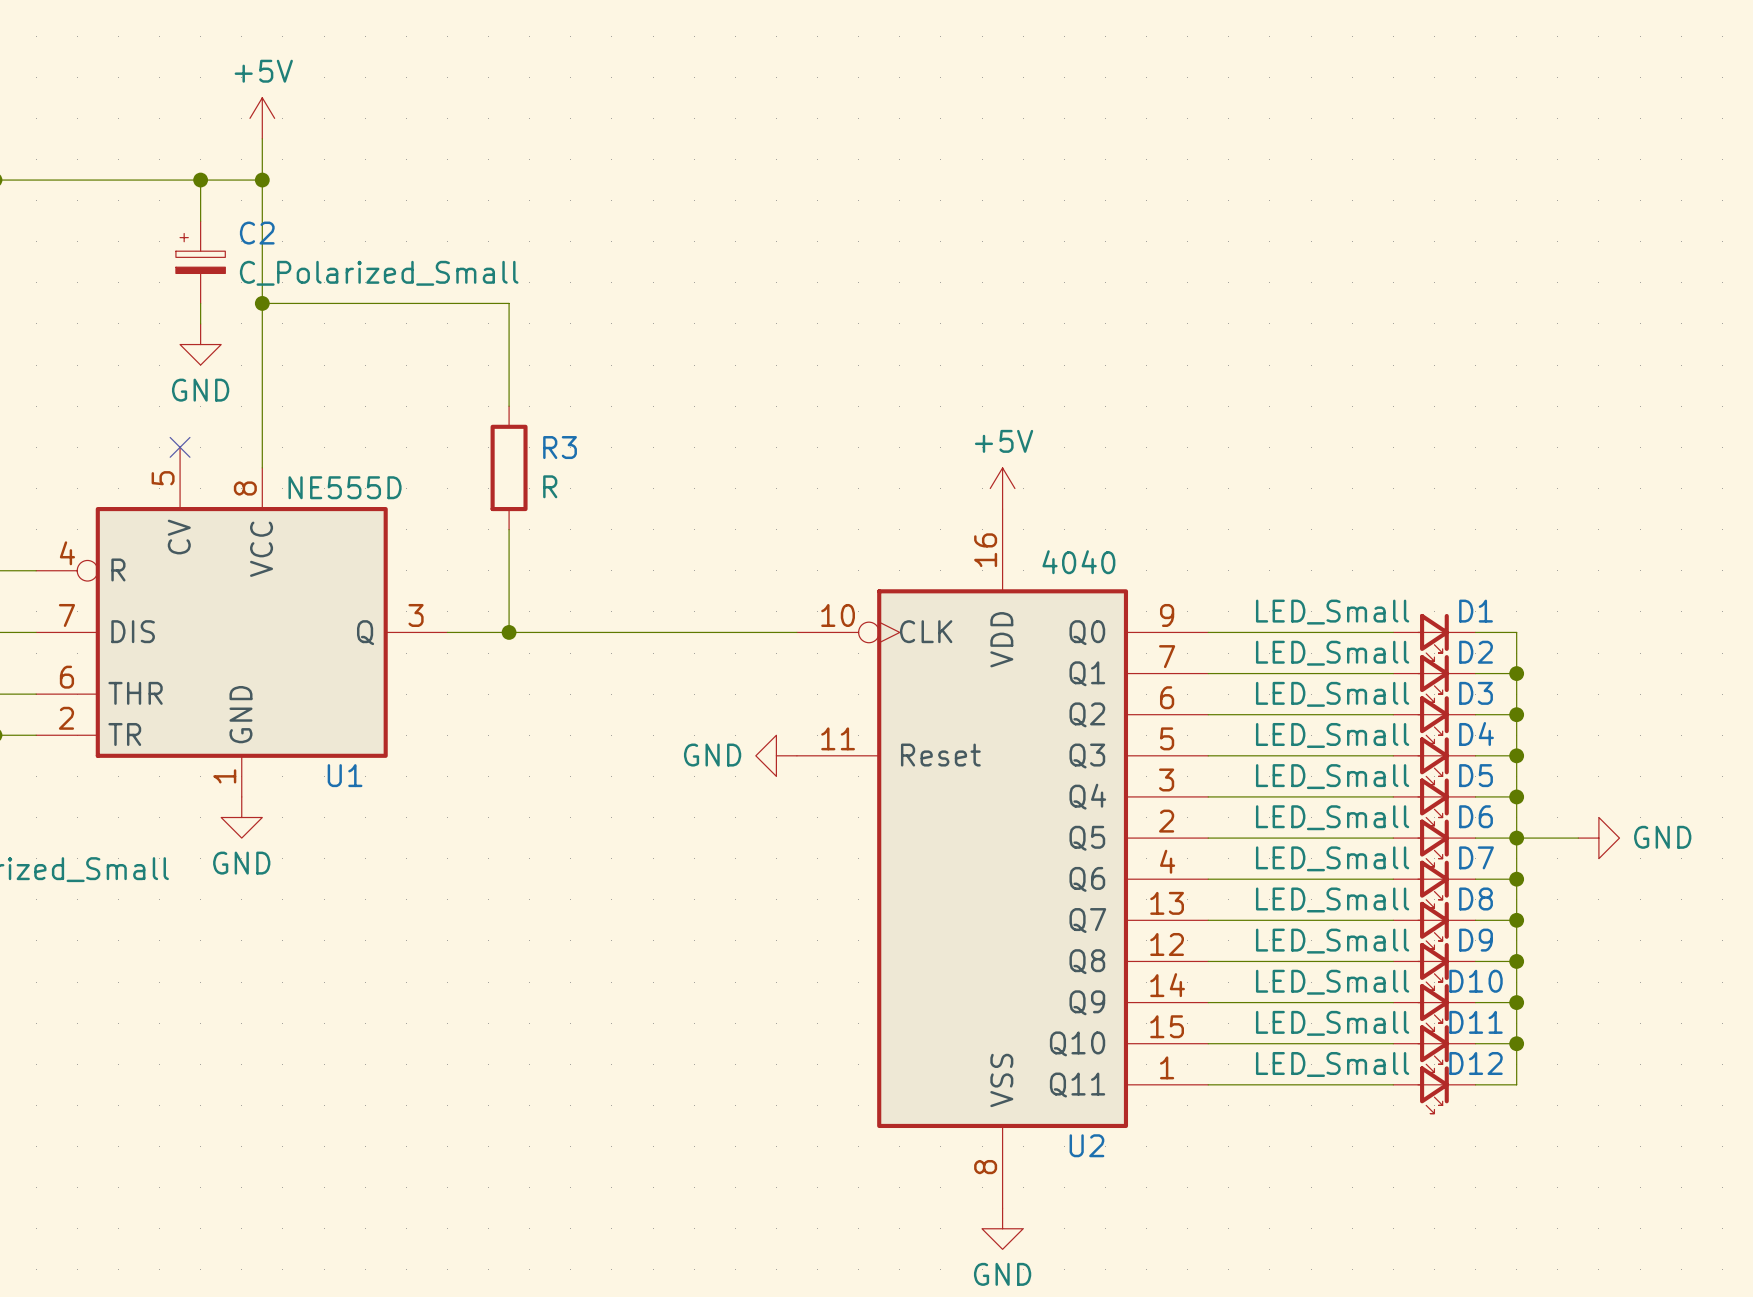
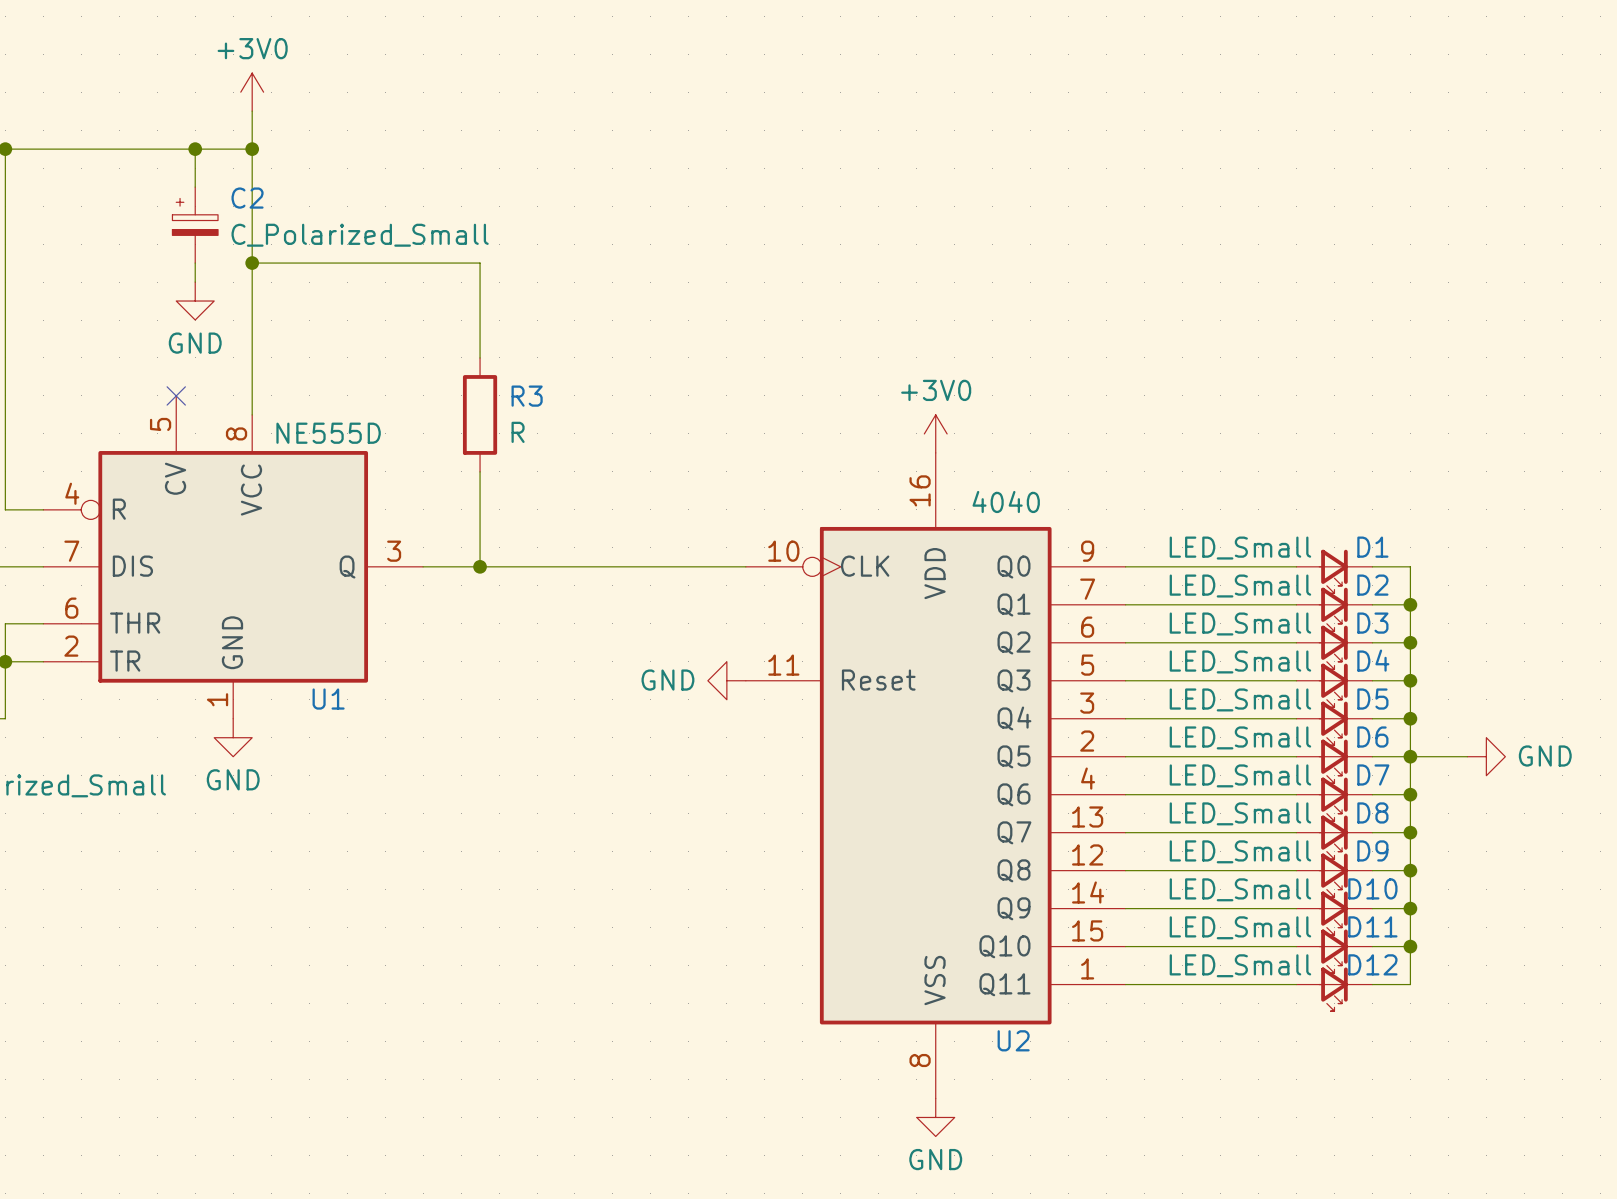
power symbol: +5V (262, 118) -> +3V0 (252, 92)
power symbol: +5V (1002, 488) -> +3V0 (935, 433)

